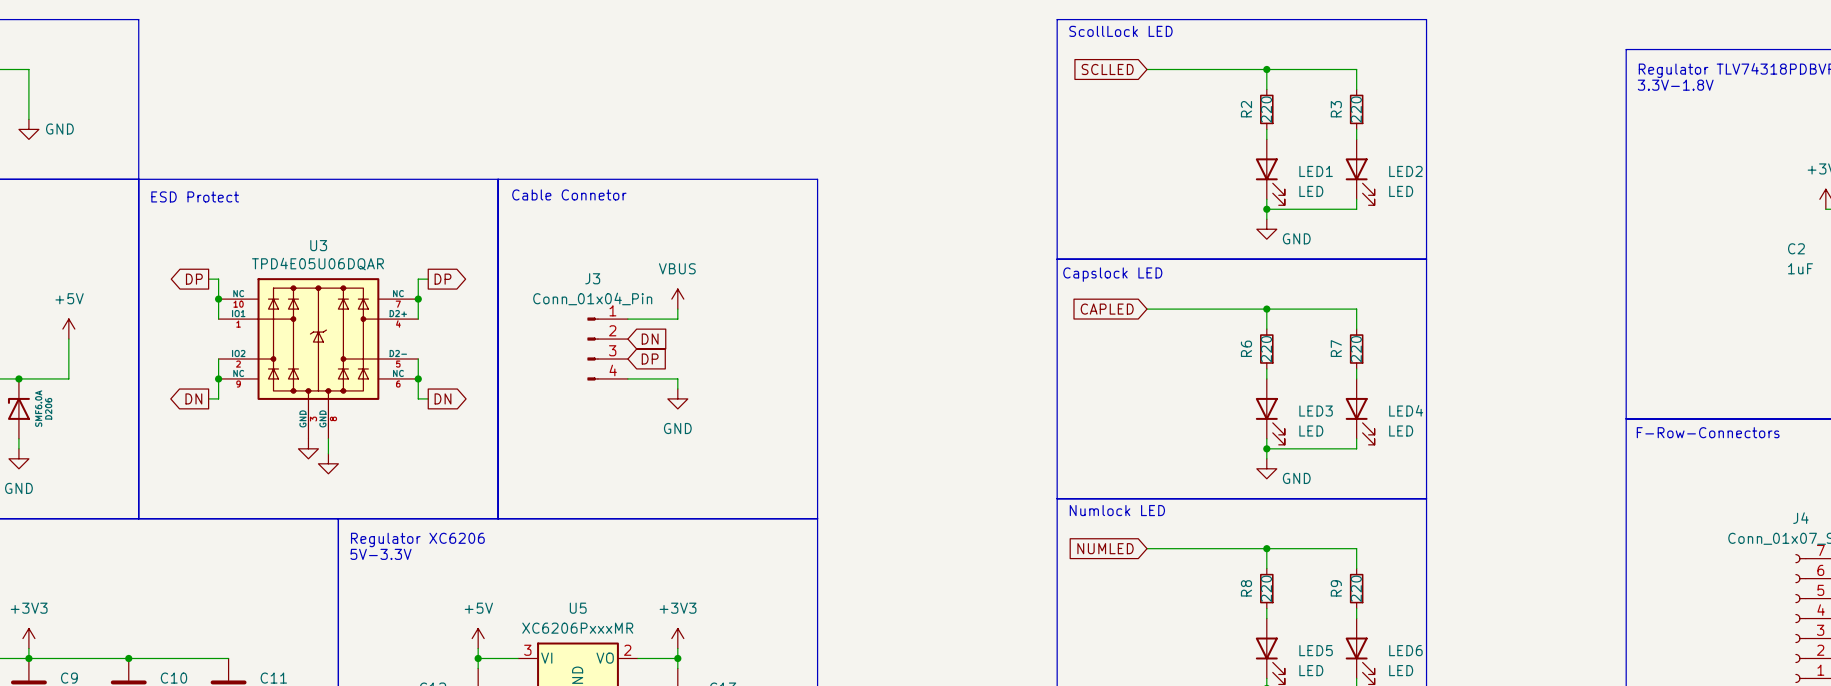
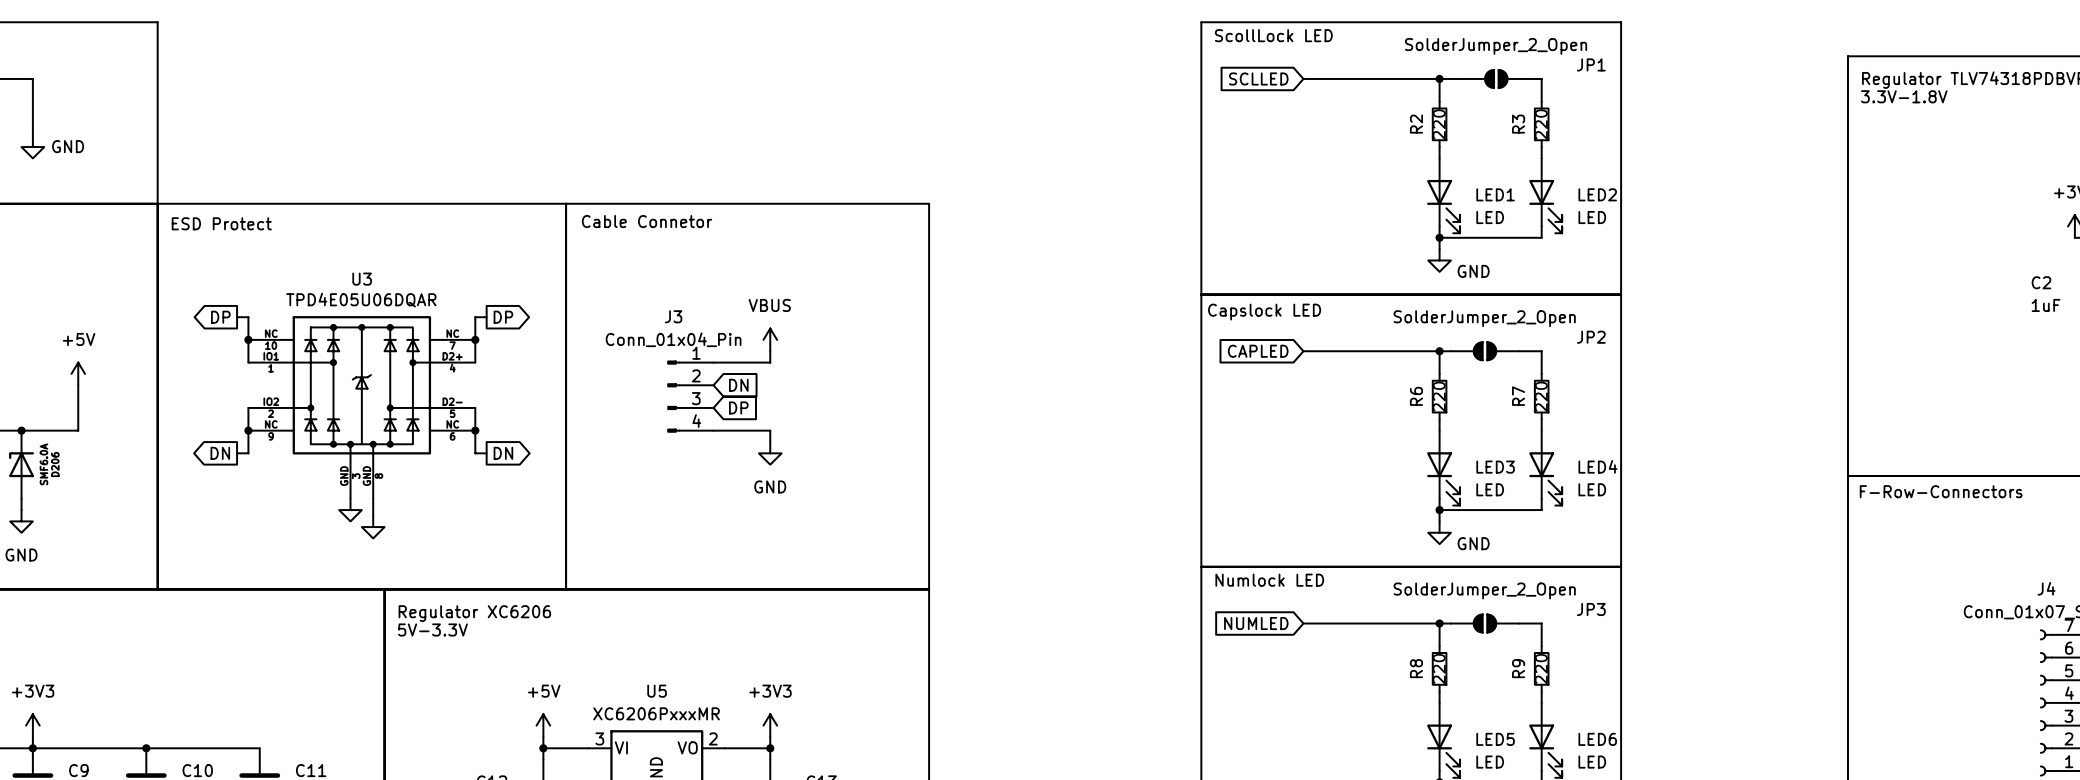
JP1: none -> SolderJumper_2_Open (1496, 78)
JP2: none -> SolderJumper_2_Open (1484, 351)
JP3: none -> SolderJumper_2_Open (1484, 623)

